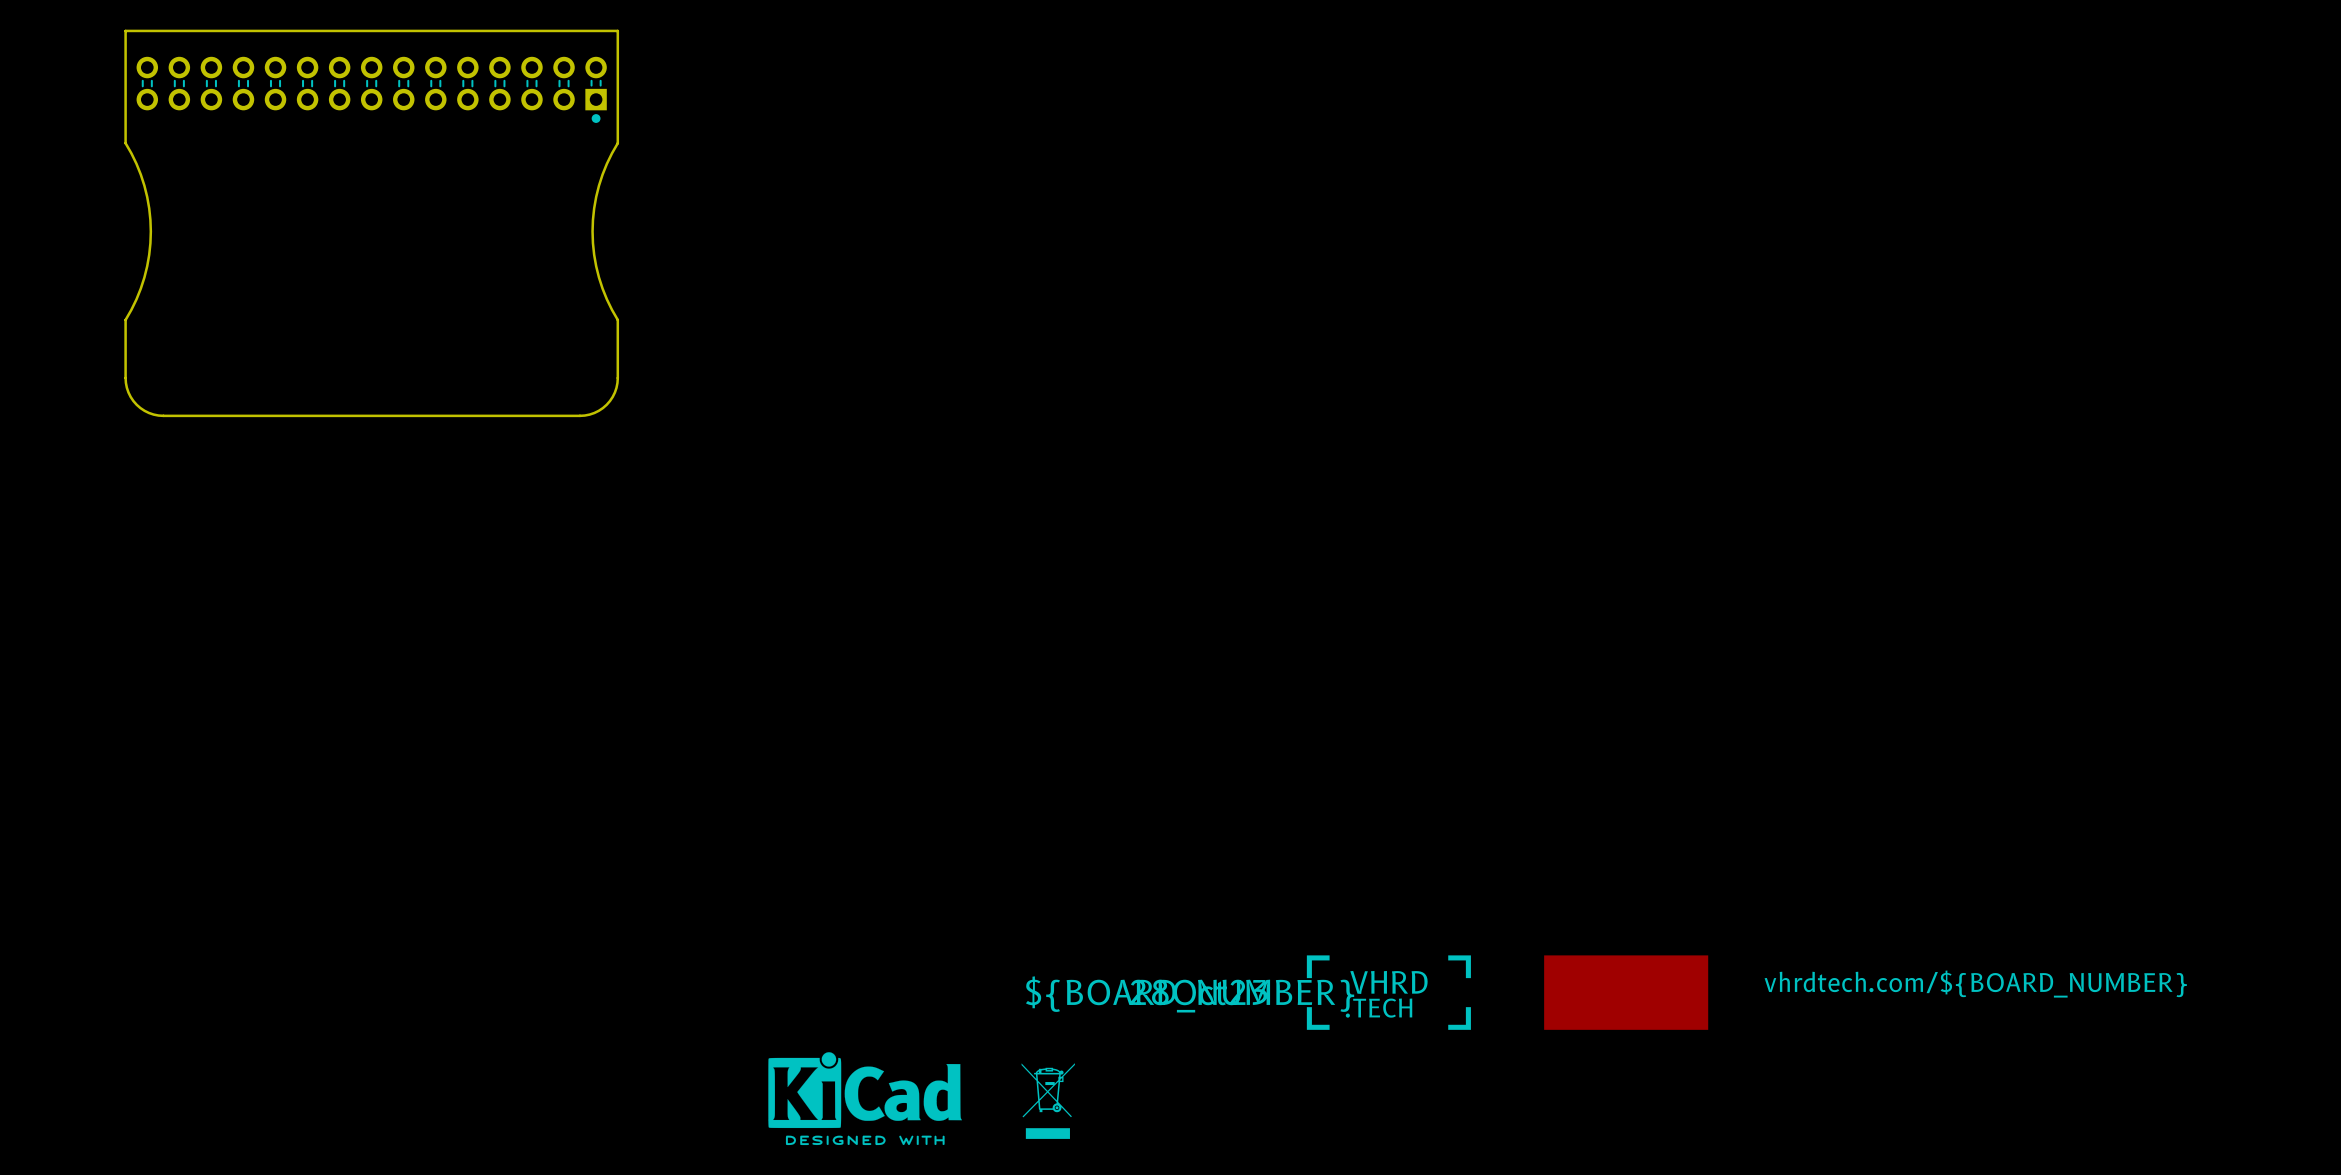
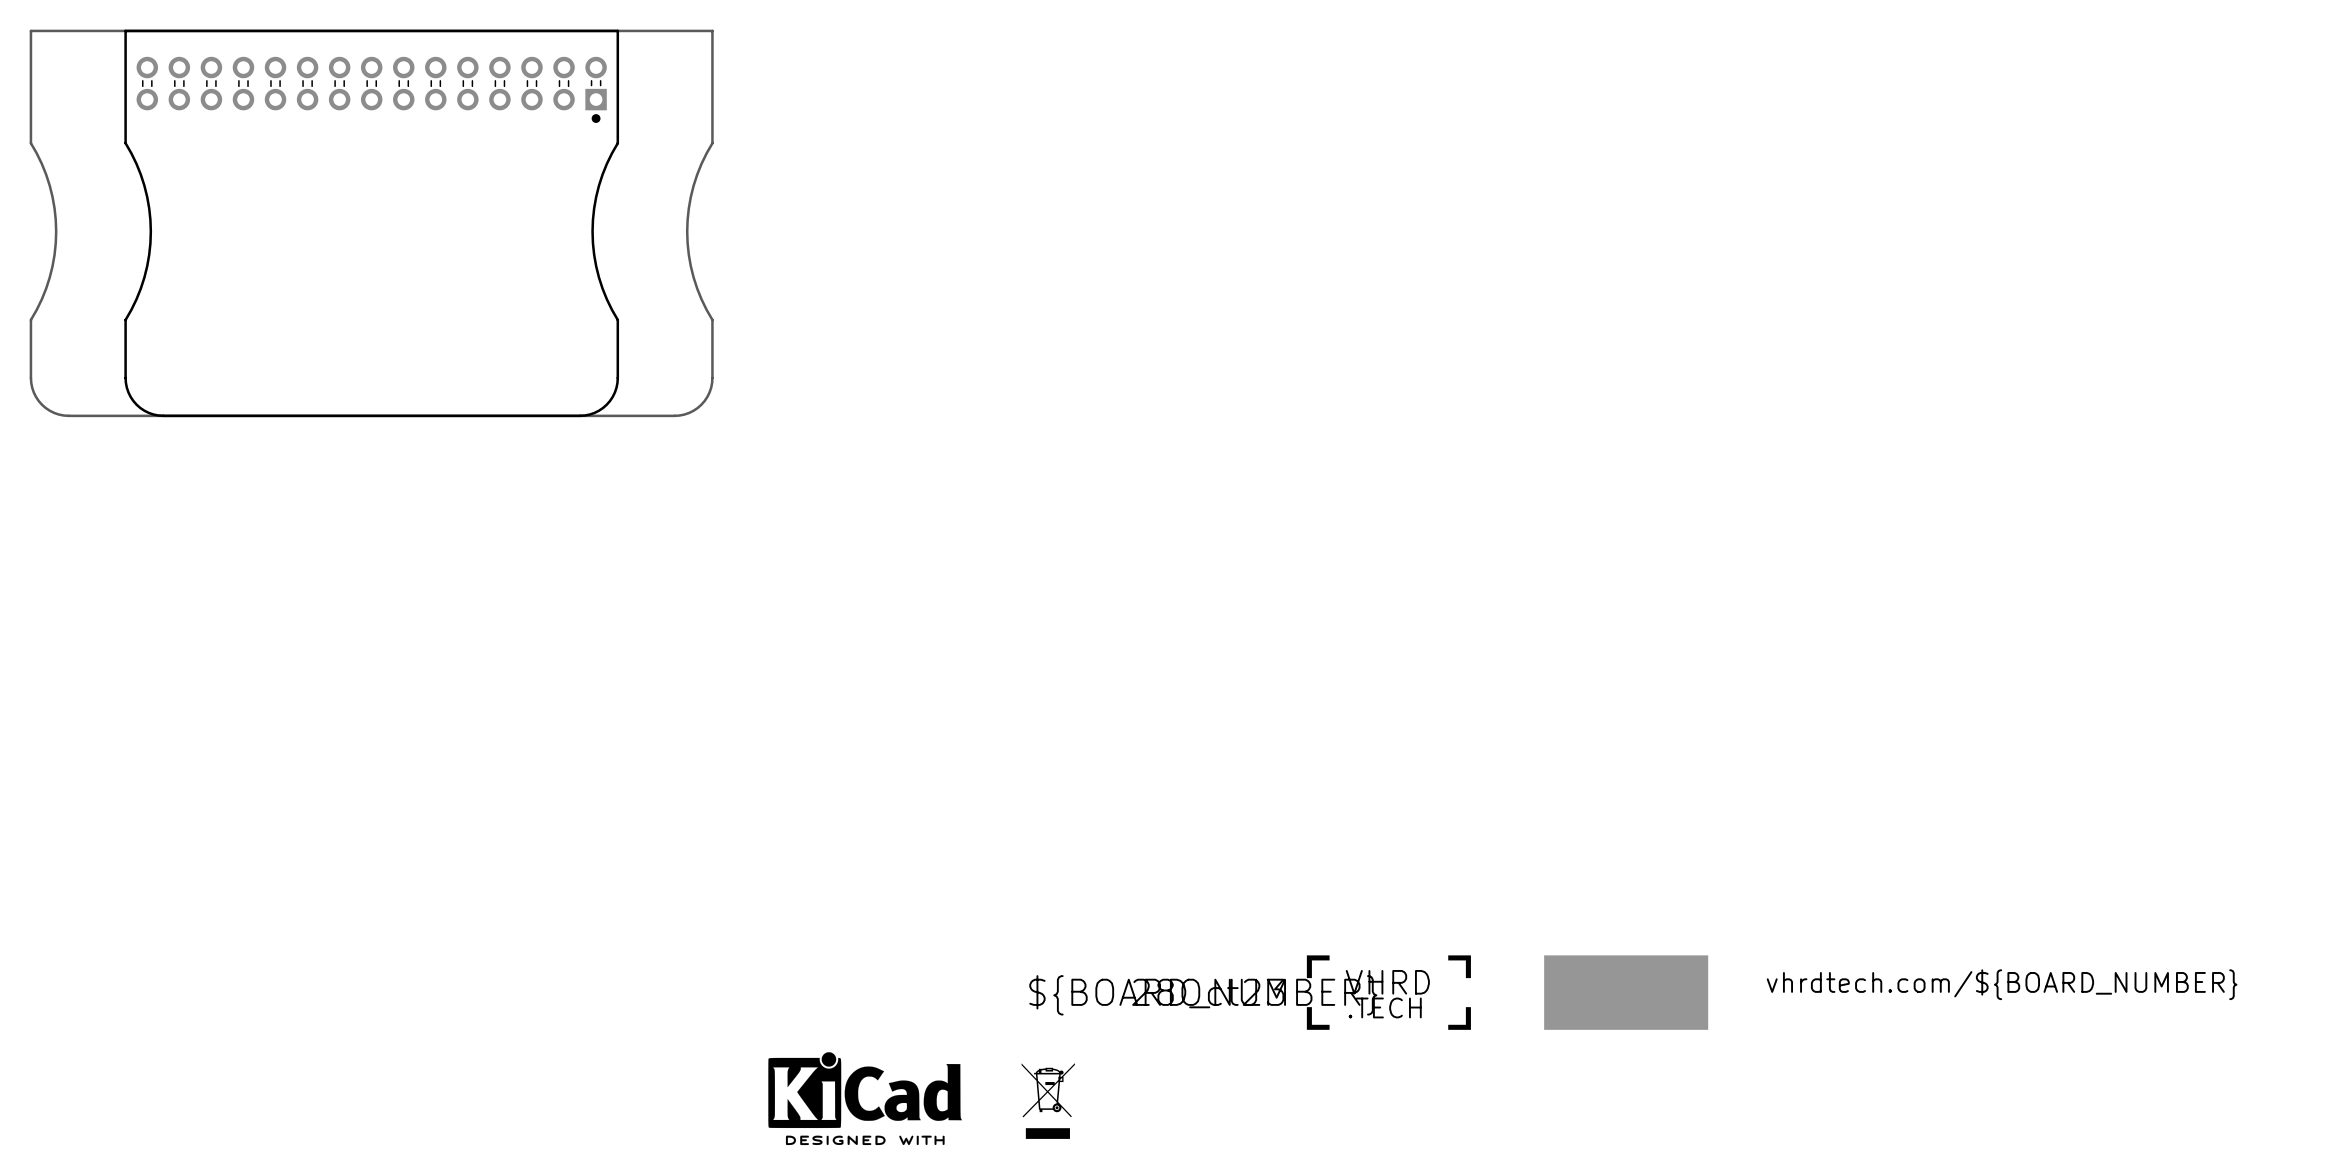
line: none -> (30, 30) (30, 143) (41, 163) (49, 185) (54, 208) (56, 231) (54, 254) (49, 277) (41, 299) (30, 319) (30, 378) (36, 396) (49, 410) (68, 415) (674, 415) (693, 410) (707, 396) (712, 382) (712, 319) (701, 299) (693, 277) (688, 254) (687, 231) (688, 208) (693, 185) (701, 163) (712, 143) (712, 30) (30, 30)

